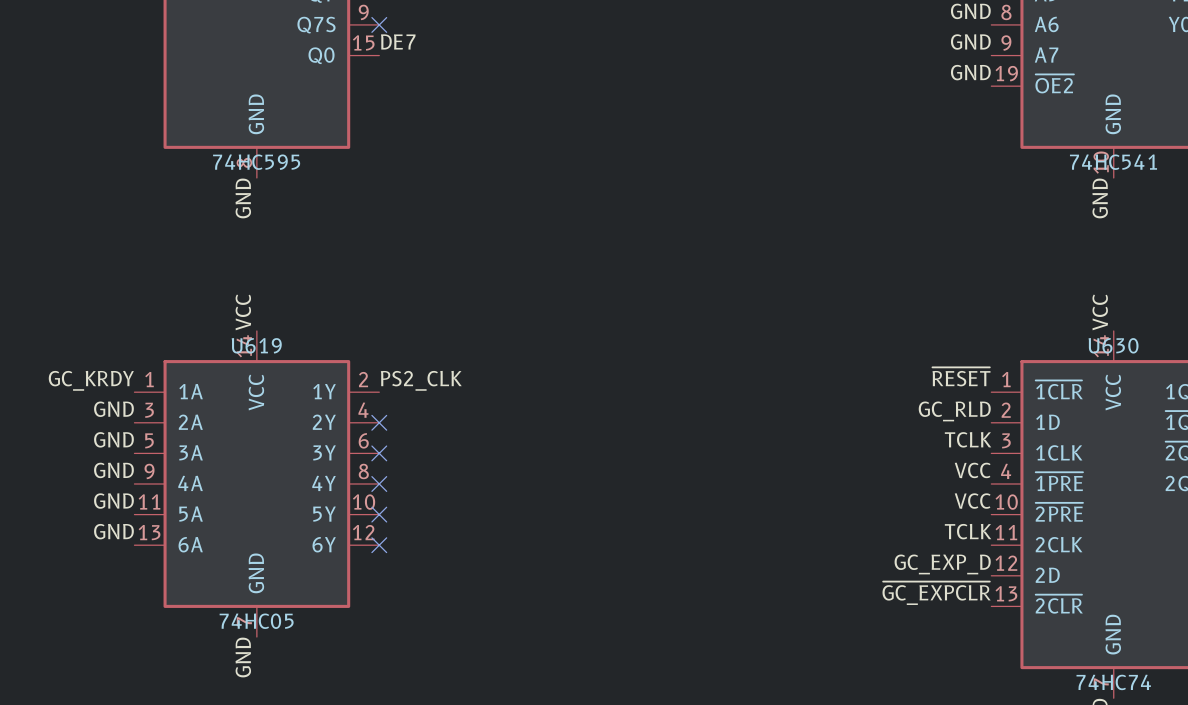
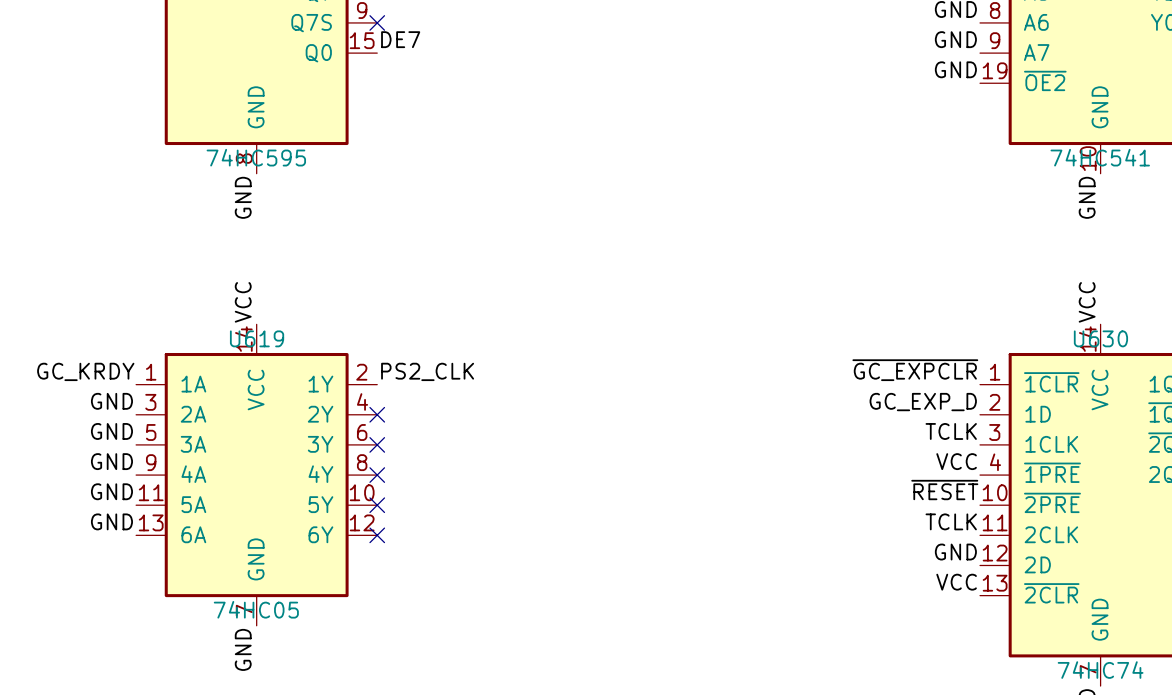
label: ~{RESET} (961, 376) -> ~{GC_EXPCLR} (915, 370)
label: GC_RLD (954, 411) -> GC_EXP_D (923, 402)
label: VCC (972, 501) -> ~{RESET} (944, 490)
label: GC_EXP_D (942, 564) -> GND (955, 552)
label: ~{GC_EXPCLR} (936, 593) -> VCC (956, 582)

